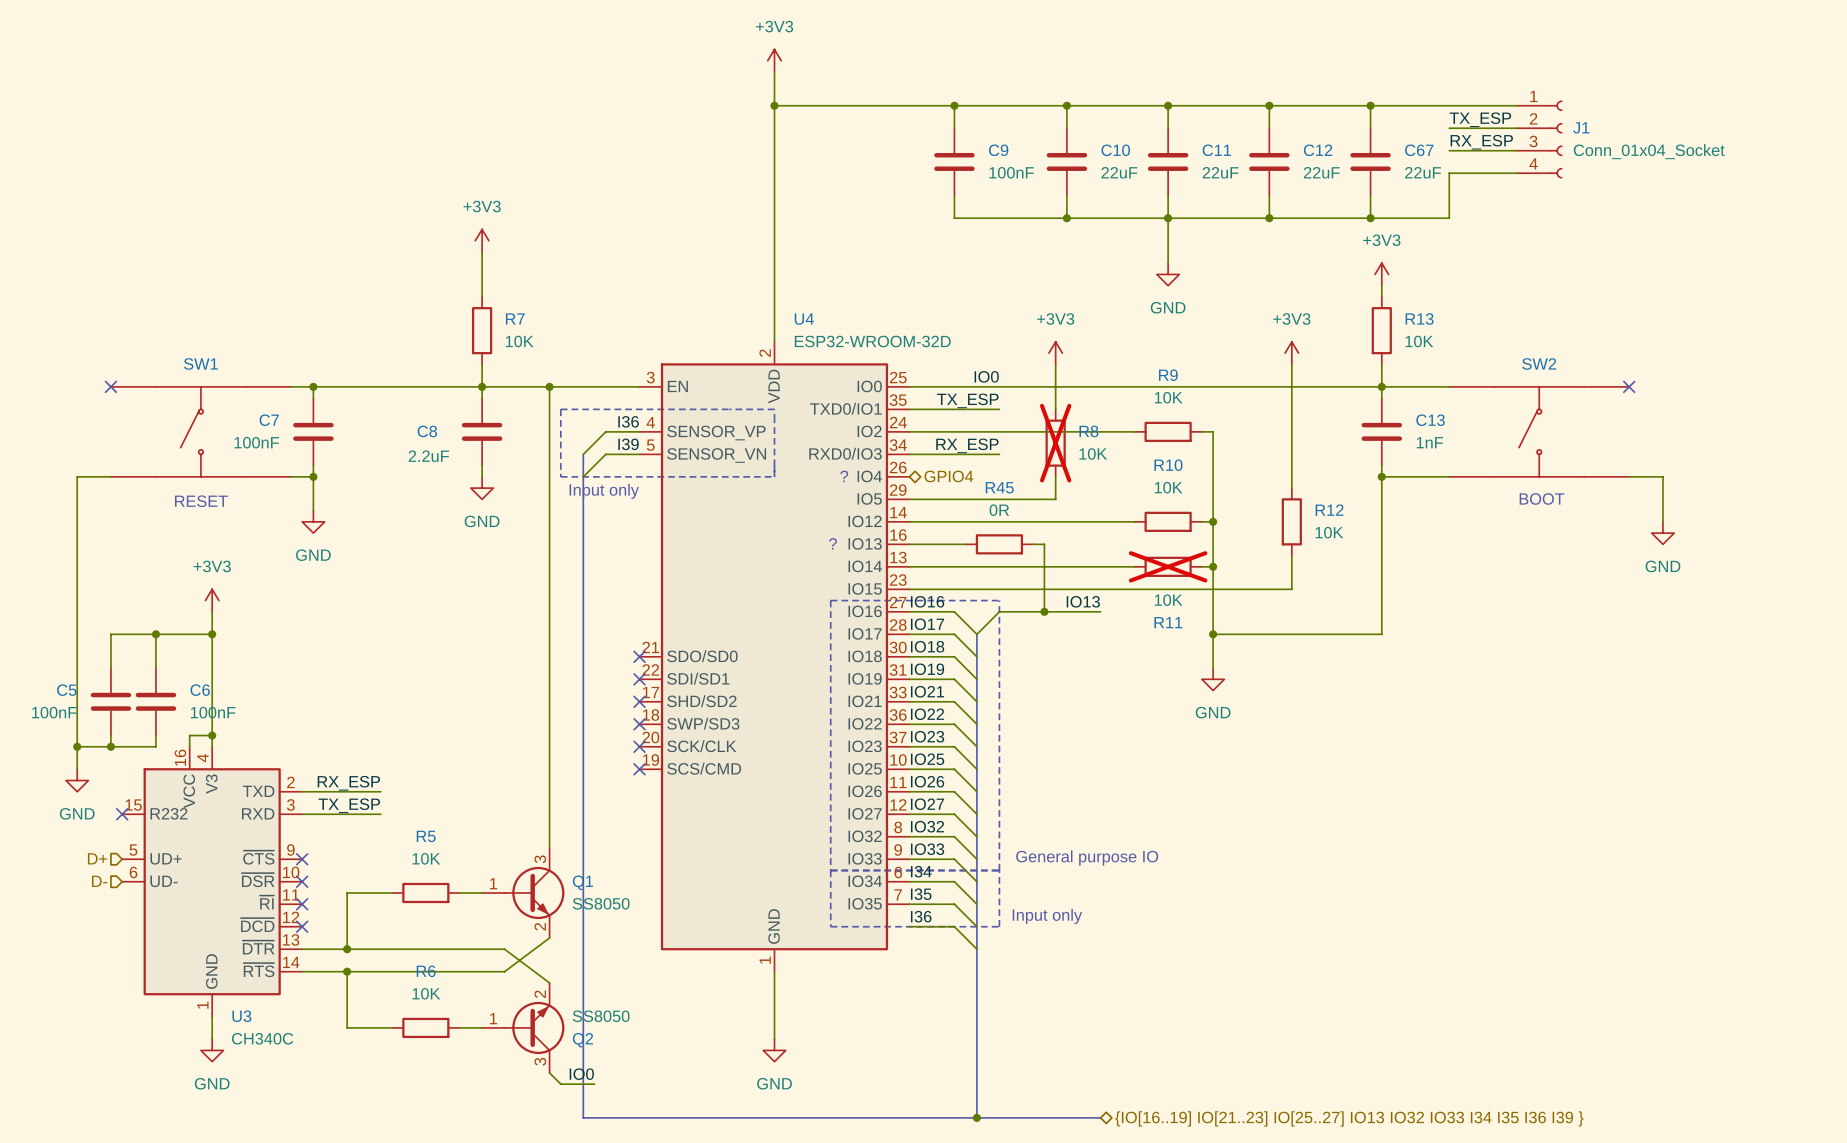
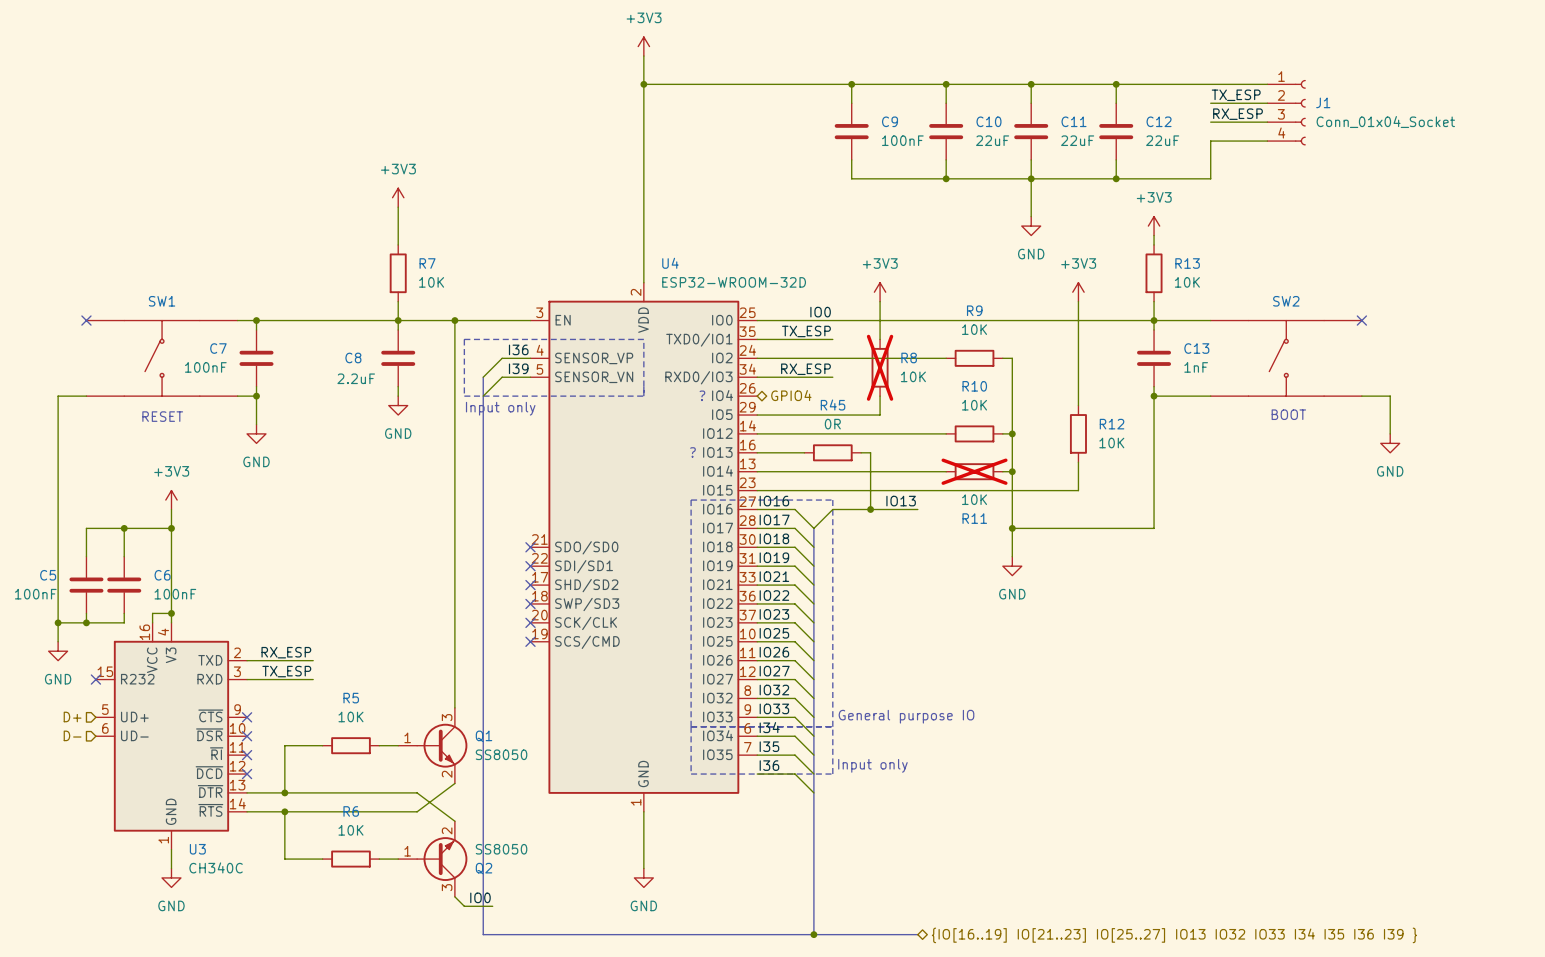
wire: (954, 105) (954, 128) -> (851, 84) (851, 103)
junction: (954, 105) -> none
junction: none -> (851, 84)
wire: (1066, 105) (1066, 128) -> (946, 84) (946, 103)
junction: (1066, 105) -> none
junction: none -> (946, 84)
wire: (1168, 105) (1168, 128) -> (1031, 84) (1031, 103)
junction: (1168, 105) -> none
junction: none -> (1031, 84)
wire: (1269, 105) (1269, 128) -> (1116, 84) (1116, 103)
junction: (1269, 105) -> none
junction: none -> (1116, 84)
wire: (1370, 105) (1370, 128) -> none
junction: (1370, 105) -> none
C9 position: (954, 161) -> (851, 131)
C10 position: (1066, 161) -> (946, 131)
C11 position: (1168, 161) -> (1031, 131)
C12 position: (1269, 161) -> (1116, 131)
C67: 22uF (1370, 161) -> none
wire: (954, 195) (954, 218) (1021, 218) -> (851, 159) (851, 178)
wire: (1066, 195) (1066, 218) -> (946, 159) (946, 178)
wire: (1168, 195) (1168, 263) -> (1031, 159) (1031, 216)
wire: (1269, 195) (1269, 218) -> (1116, 159) (1116, 178)
wire: (1370, 195) (1370, 218) -> none
junction: (1066, 218) -> none
junction: none -> (946, 178)
junction: (1168, 218) -> none
junction: none -> (1031, 178)
junction: (1269, 218) -> none
junction: none -> (1116, 178)
junction: (1370, 218) -> none
power symbol position: GND (1168, 274) -> GND (1031, 226)

